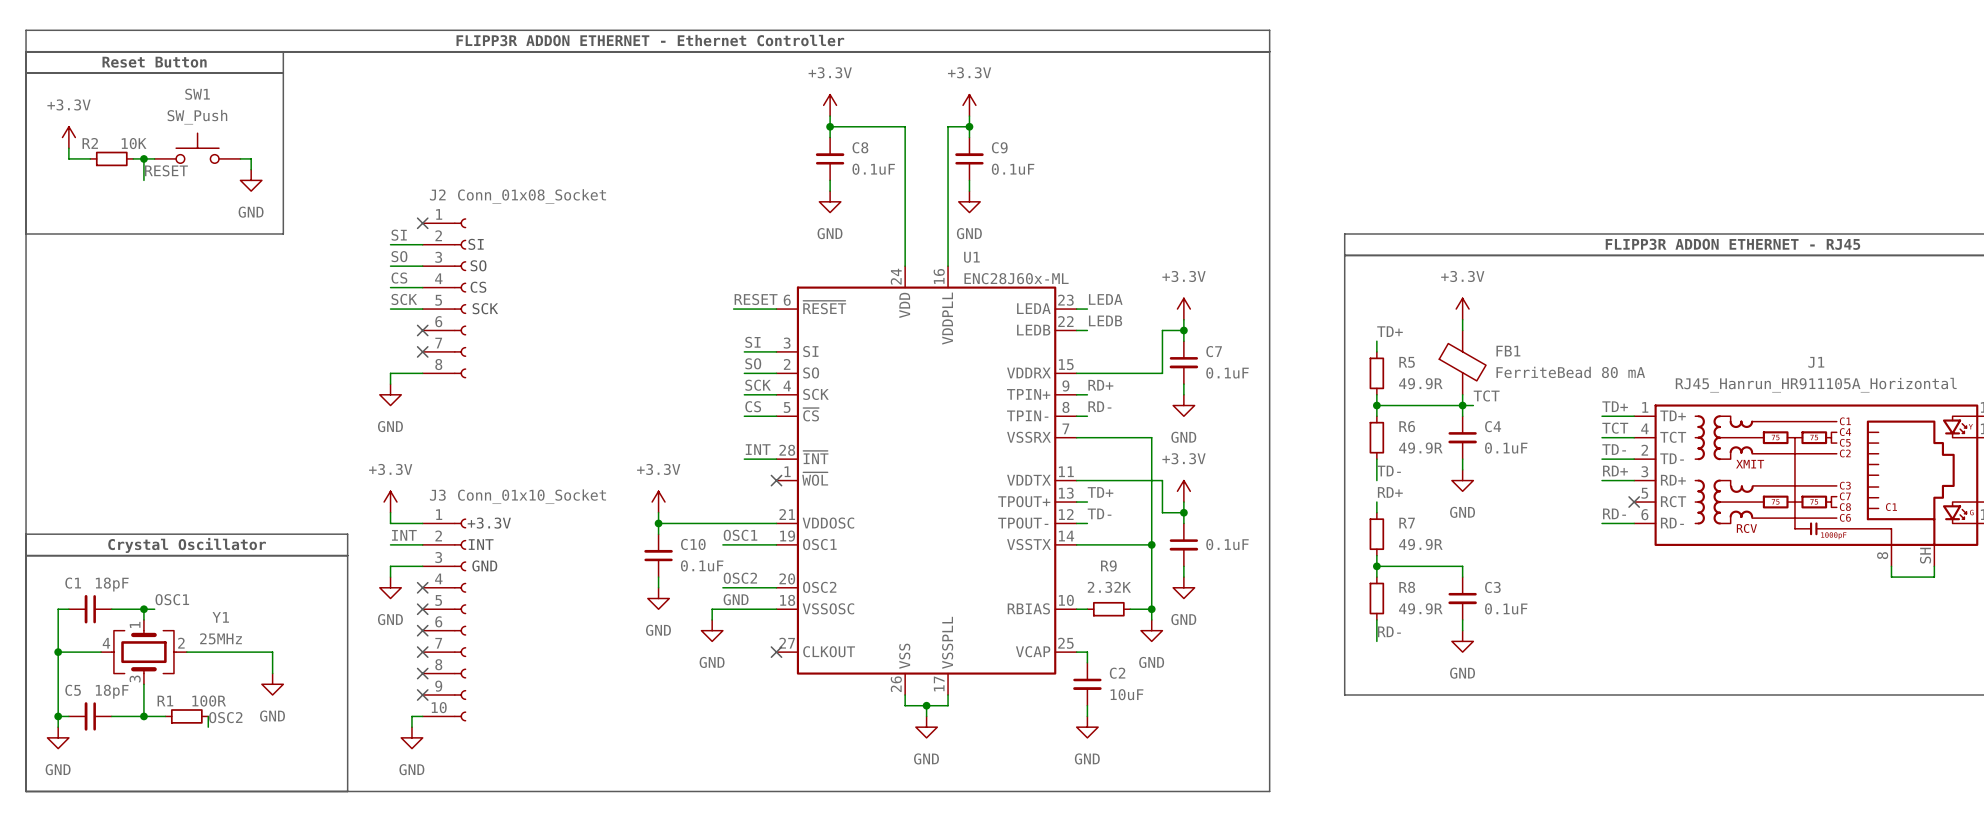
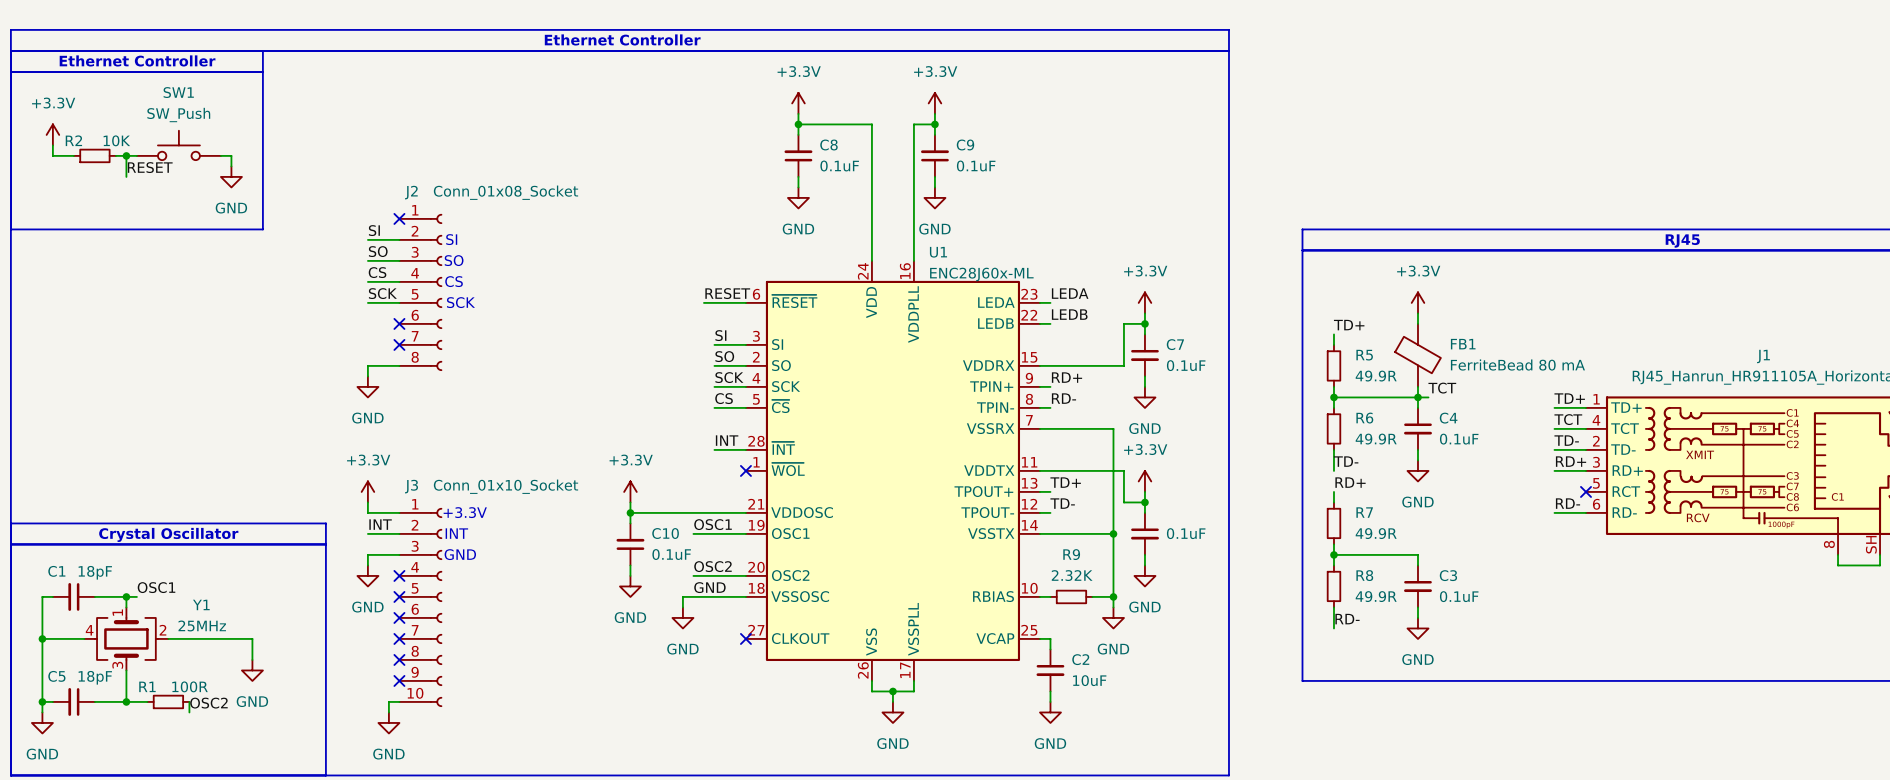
text: FLIPP3R ADDON ETHERNET - Ethernet Controller (650, 40) -> Ethernet Controller (622, 39)
text: Reset Button (154, 62) -> Ethernet Controller (137, 60)
text: FLIPP3R ADDON ETHERNET - RJ45 (1732, 244) -> RJ45 (1682, 241)

